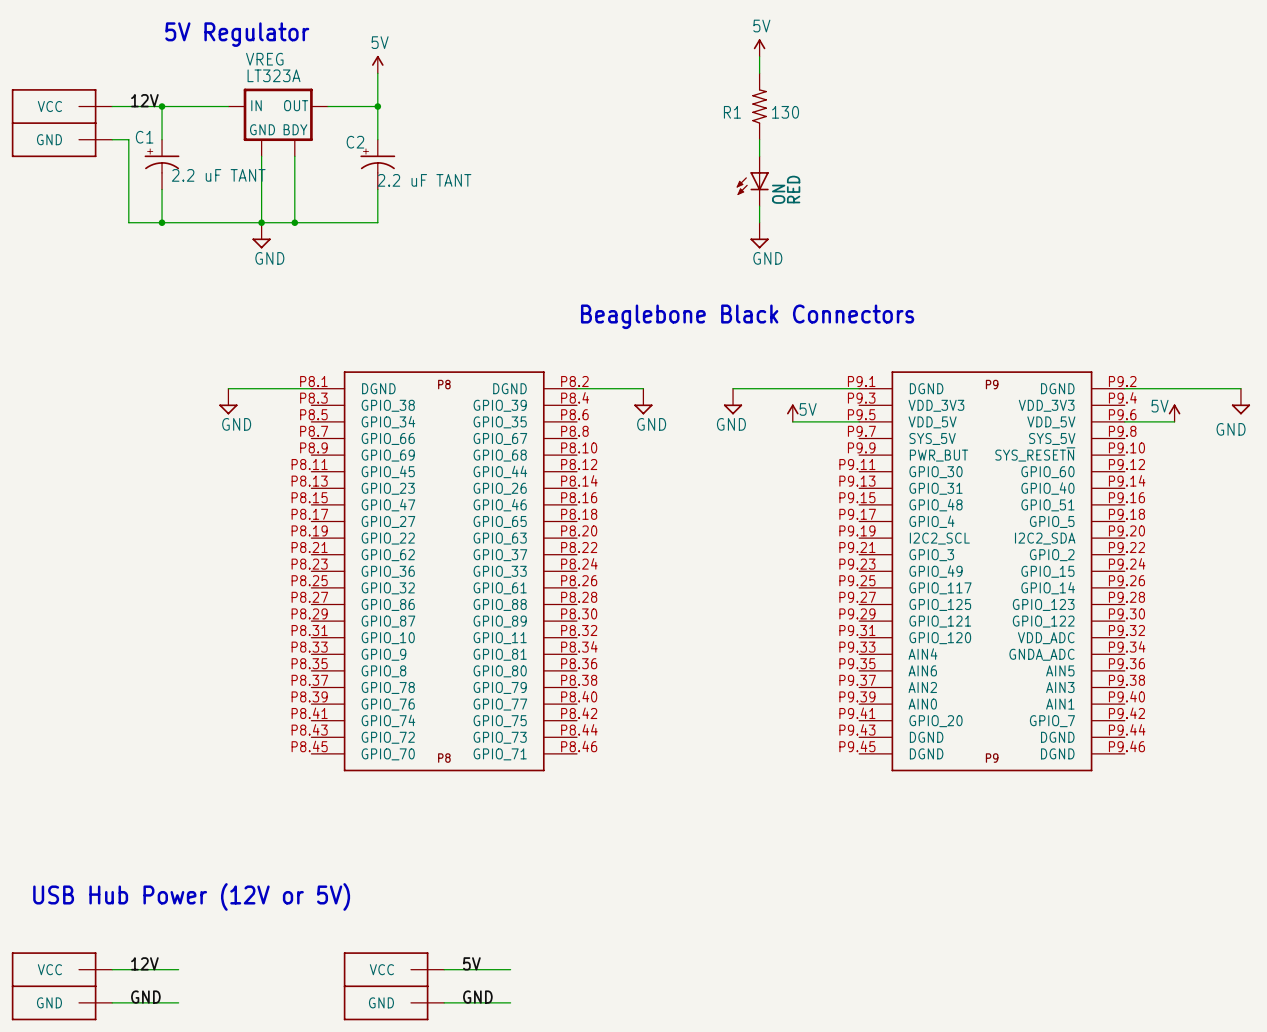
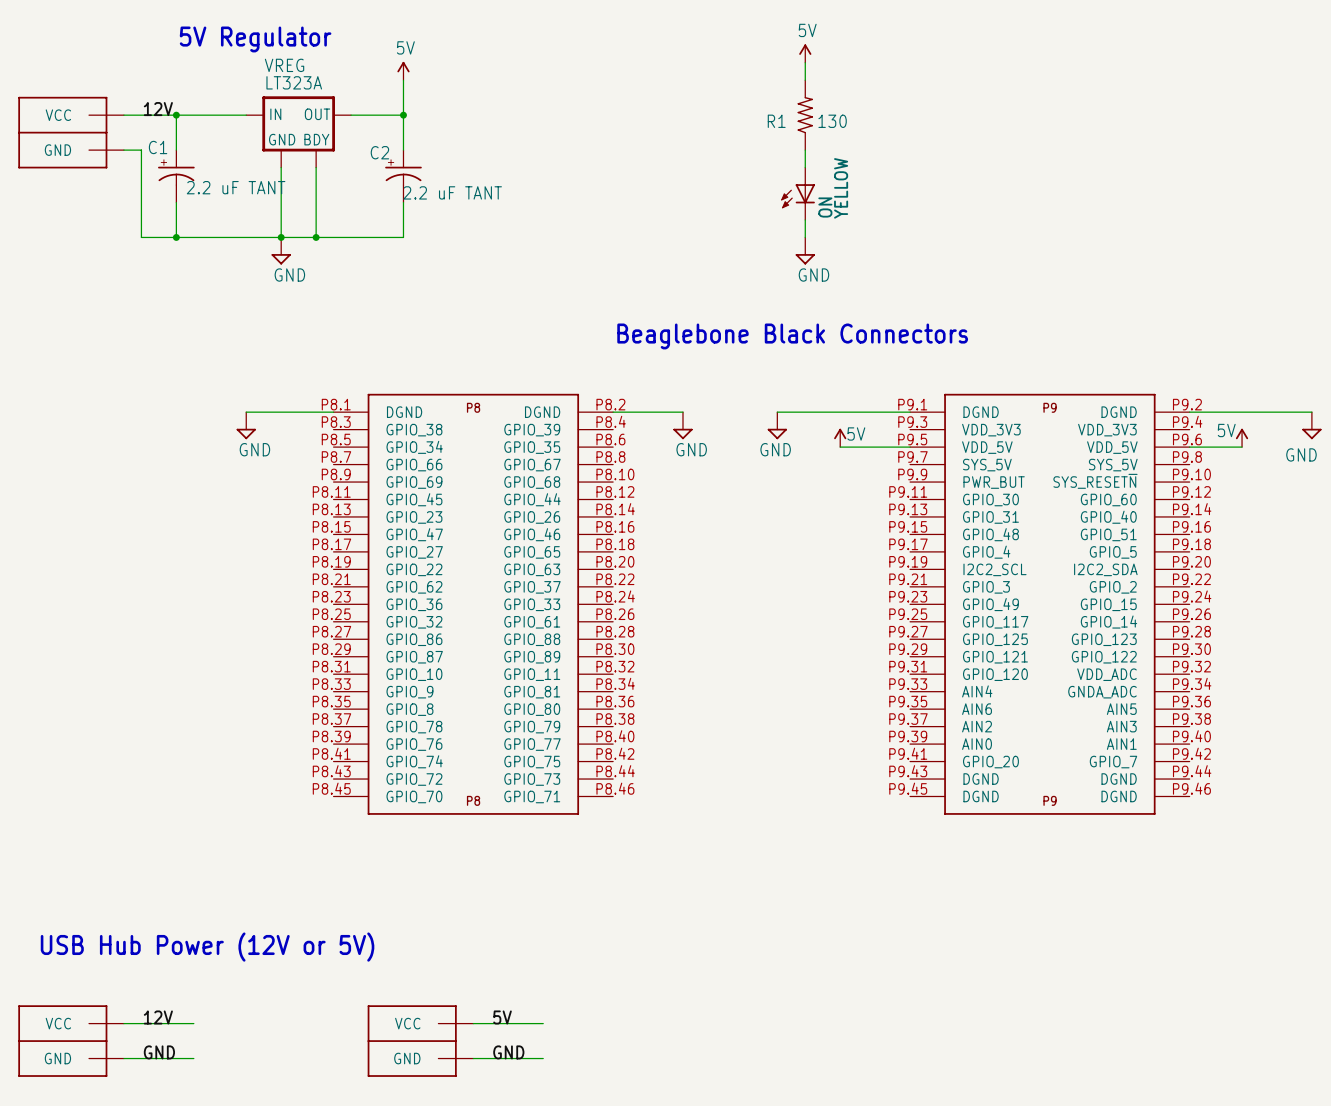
ON value: RED (793, 189) -> YELLOW (841, 188)

